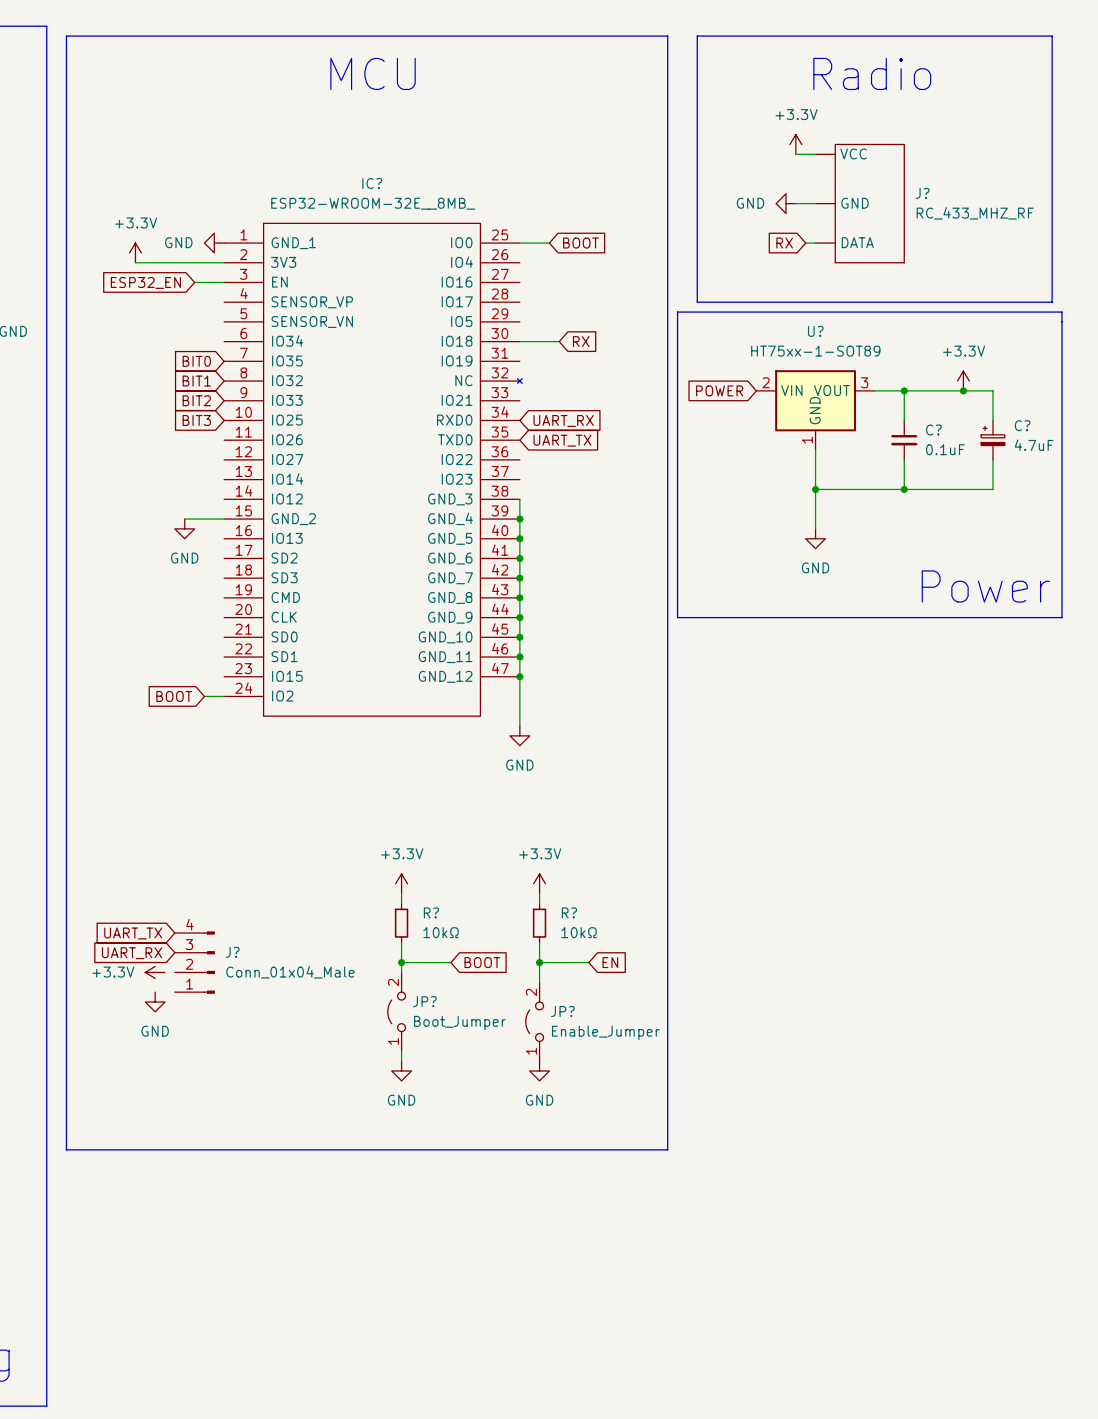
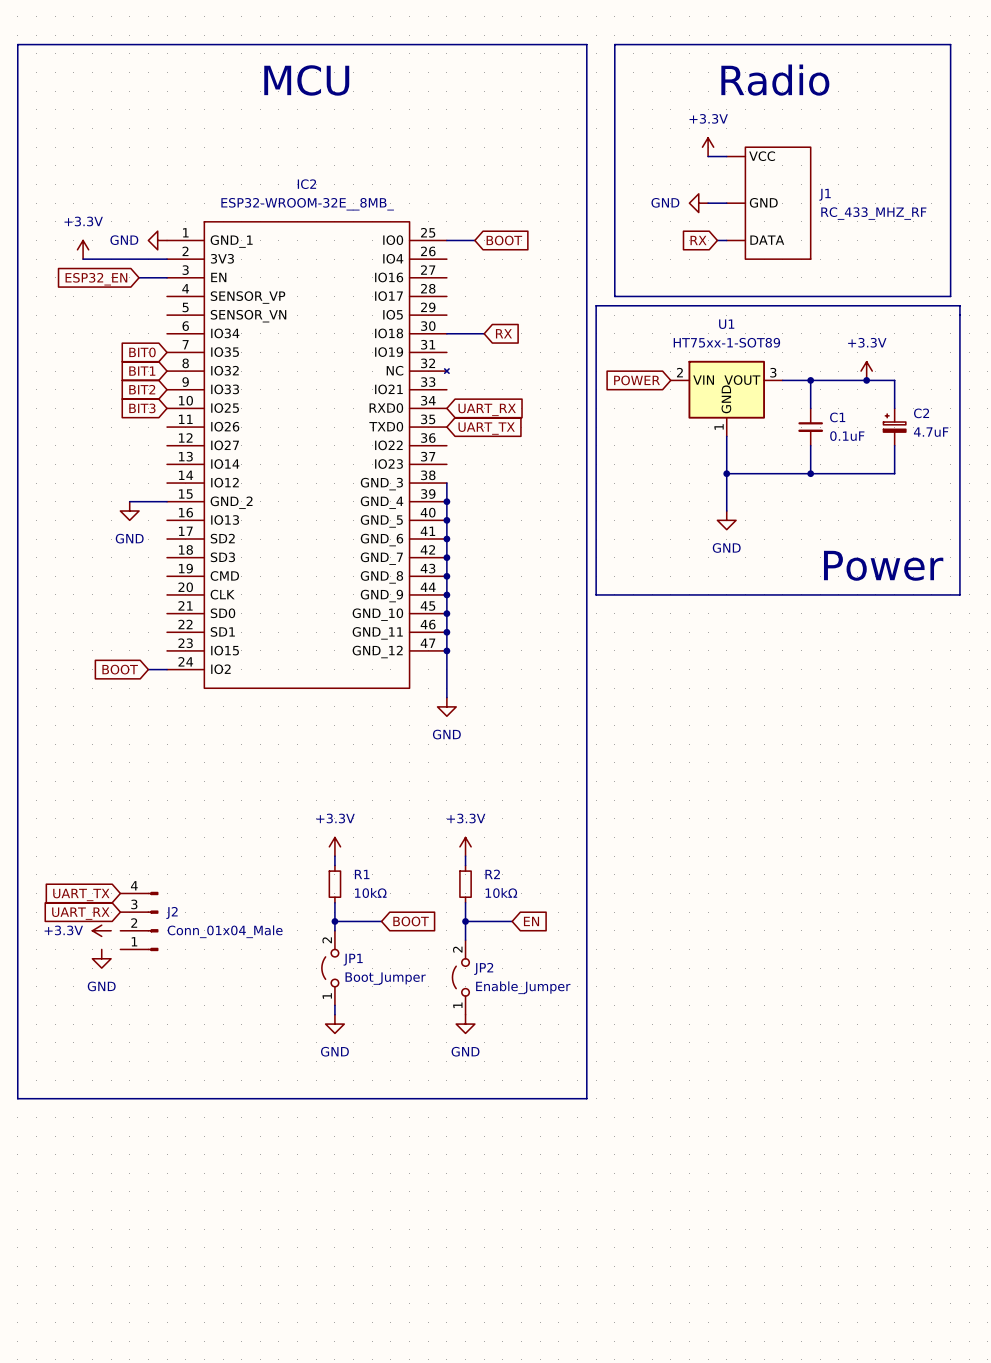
IC? name: IC? (372, 183) -> IC2 (306, 184)
J? name: J? (922, 193) -> J1 (825, 194)
U? name: U? (815, 331) -> U1 (726, 324)
C? name: C? (1022, 425) -> C2 (921, 413)
C? name: C? (933, 430) -> C1 (837, 417)
R? name: R? (431, 912) -> R1 (362, 874)
R? name: R? (569, 912) -> R2 (492, 874)
J? name: J? (232, 952) -> J2 (172, 912)
JP? name: JP? (424, 1001) -> JP1 (353, 959)
JP? name: JP? (562, 1011) -> JP2 (483, 968)

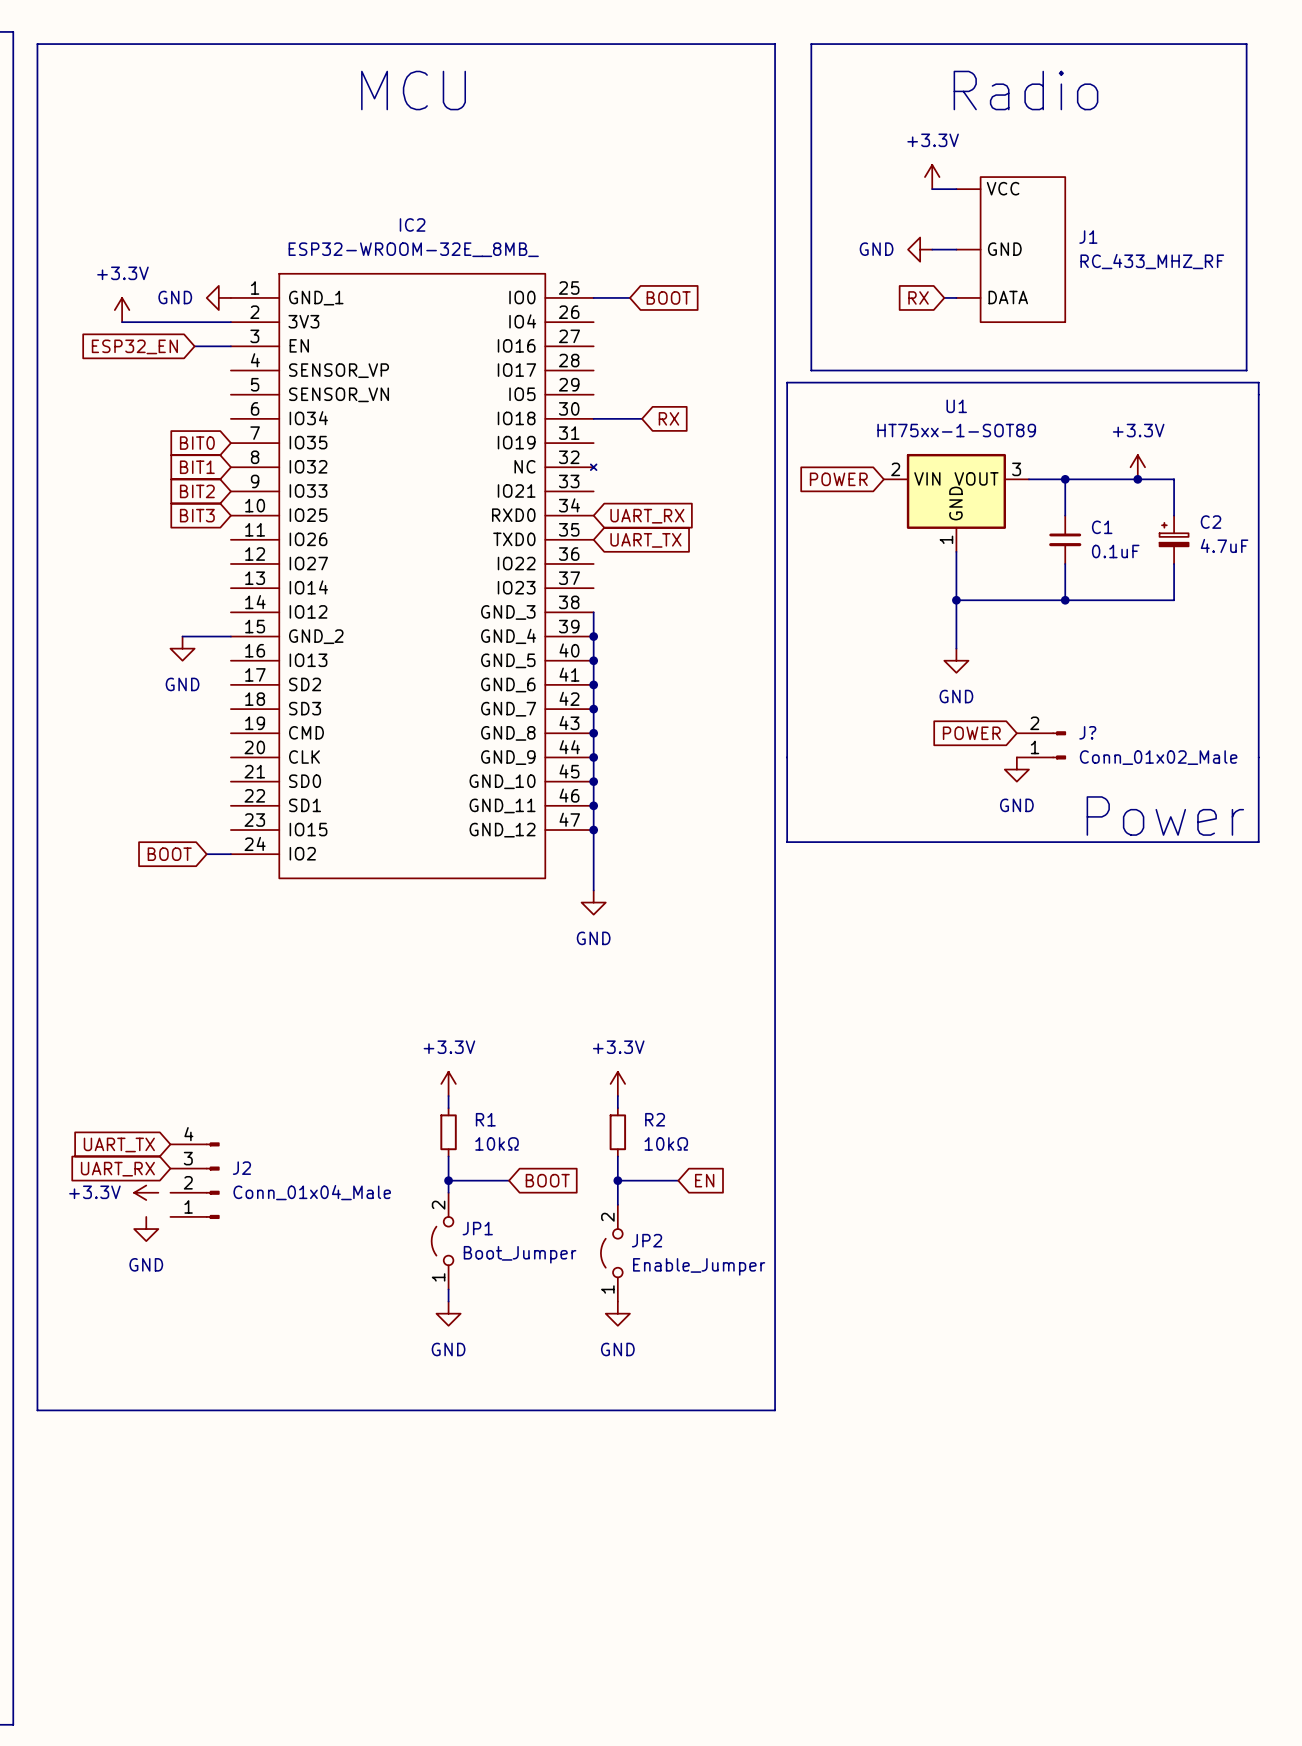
text position: Power (883, 565) -> Power (1165, 816)
global label: none -> POWER (971, 733)
J?: none -> Conn_01x02_Male (1041, 745)
line: (596, 594) (959, 594) -> (787, 757) (787, 842) (1258, 842) (1258, 757)
power symbol: none -> GND (1016, 769)

